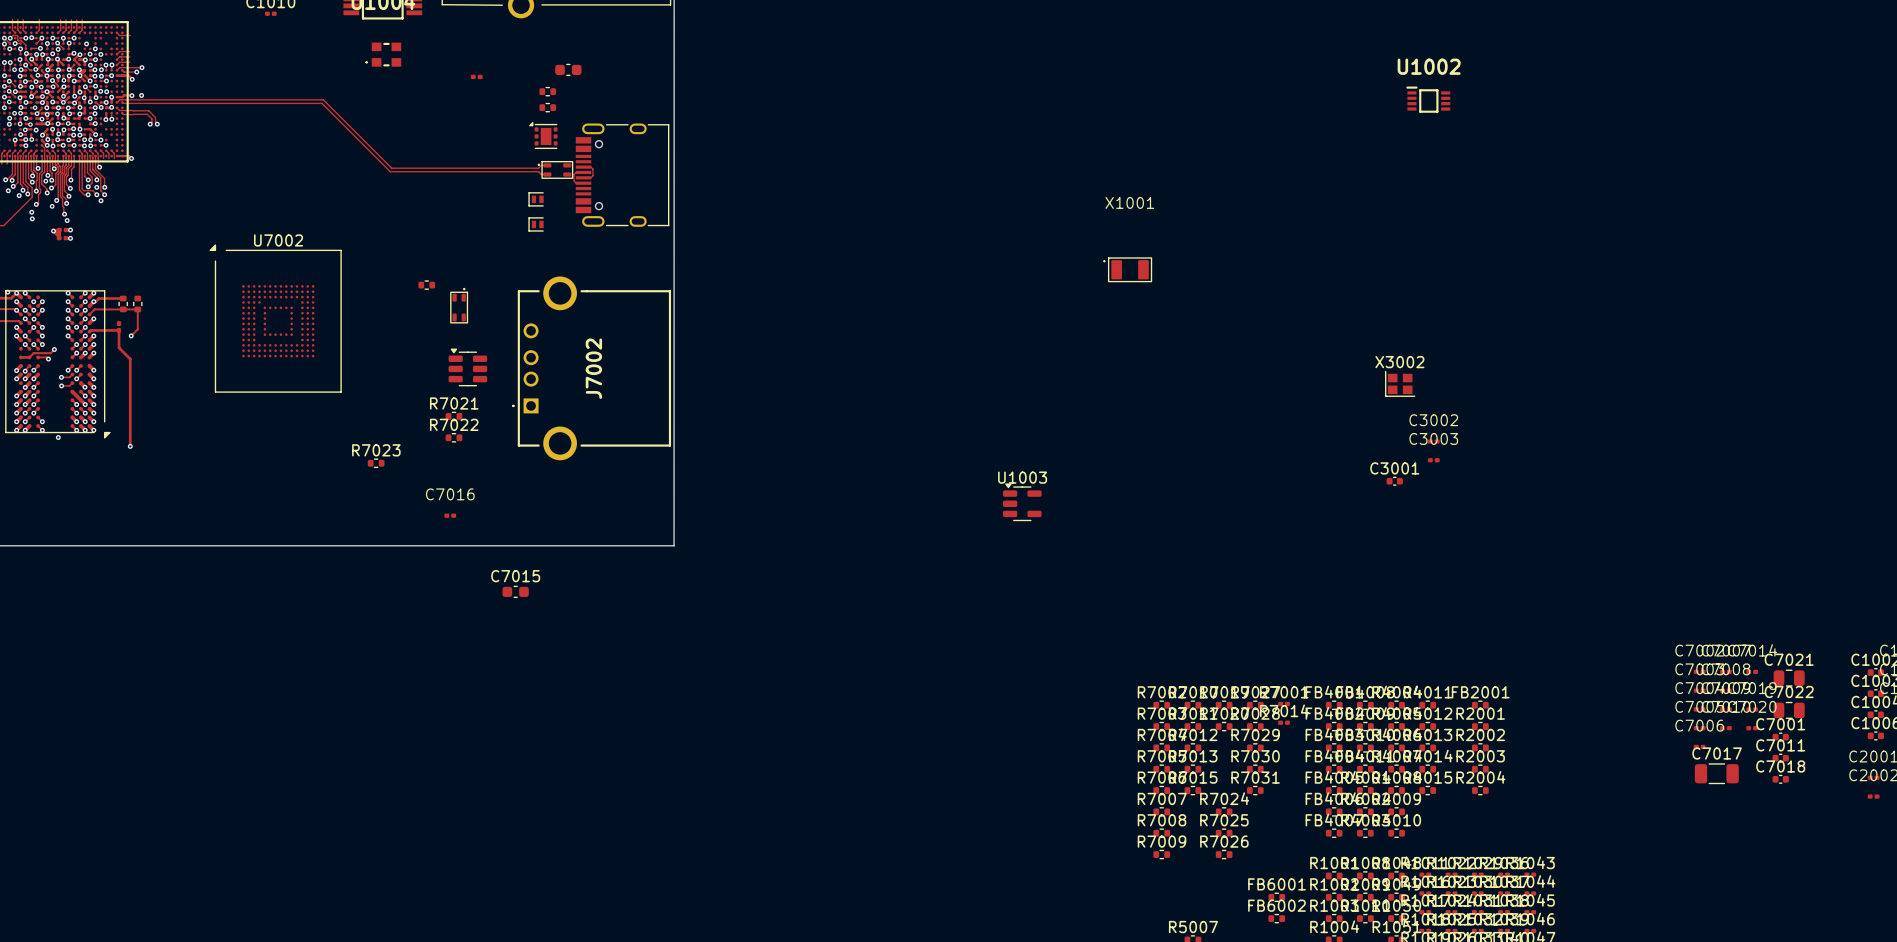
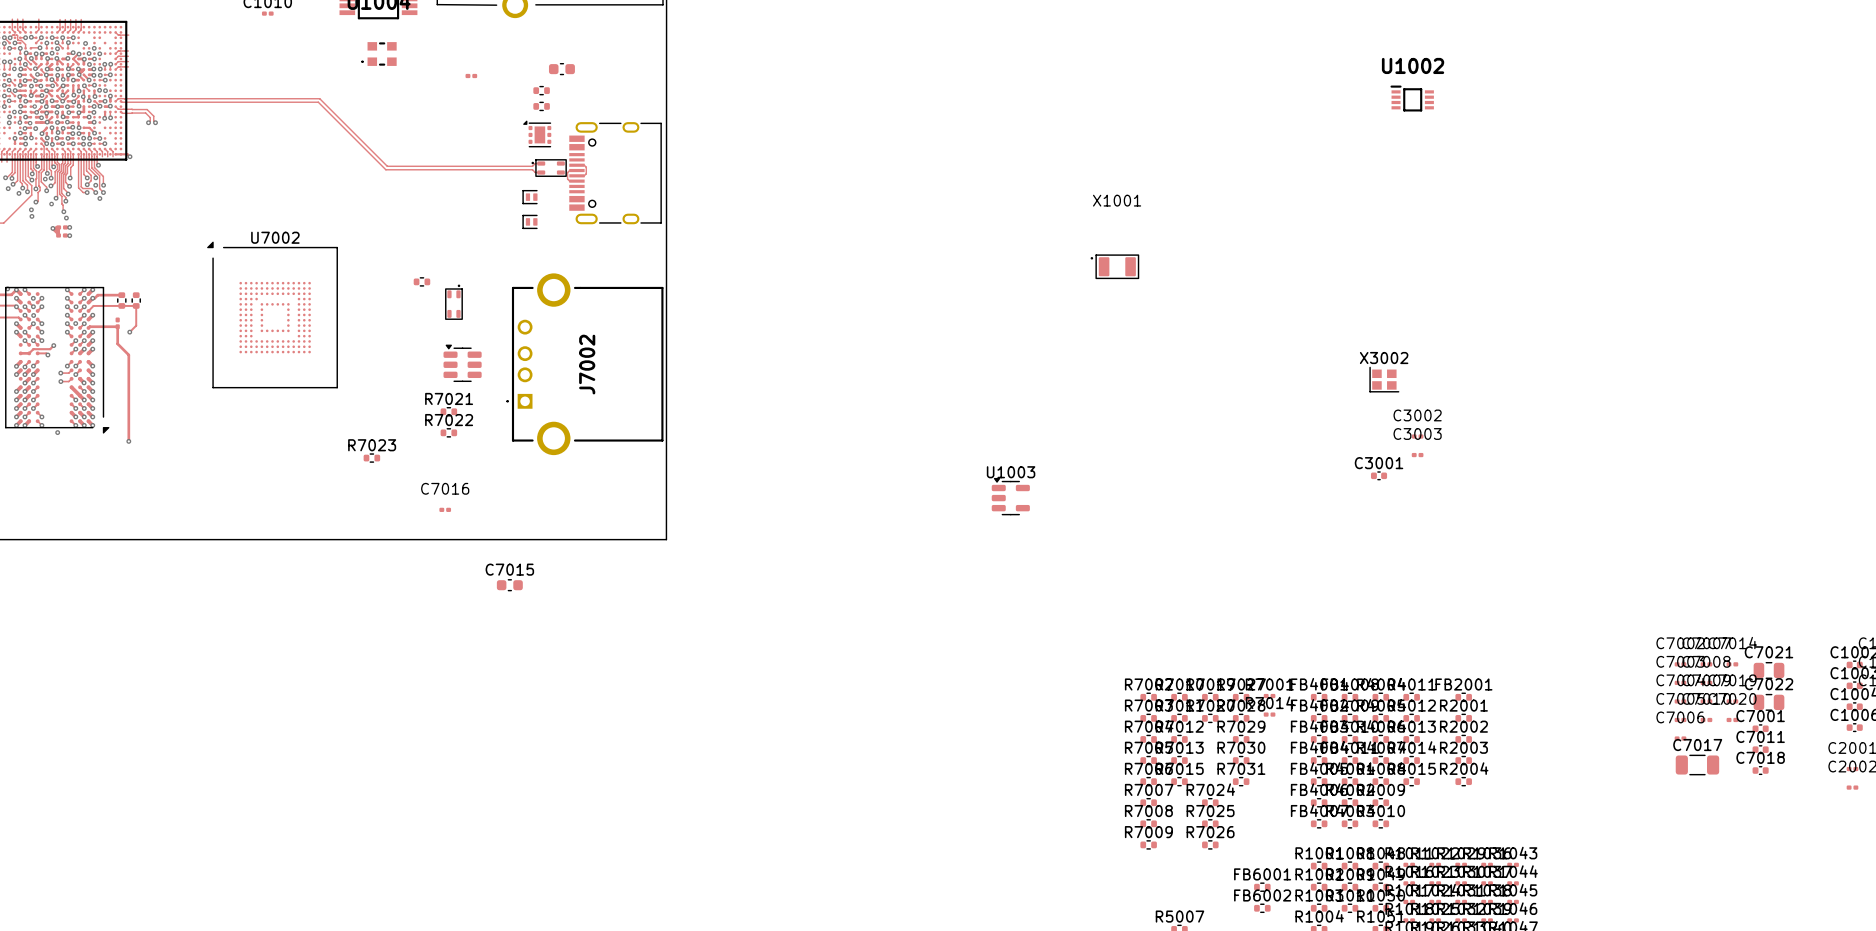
track: (129, 67) (141, 67) -> none
via: (141, 67) -> none
track: (122, 70) (124, 72) (136, 72) -> none
via: (136, 72) -> none
track: (116, 75) (128, 75) (132, 79) -> none
via: (132, 79) -> none
track: (131, 95) (116, 97) -> none
via: (131, 95) -> none
via: (141, 95) -> none

